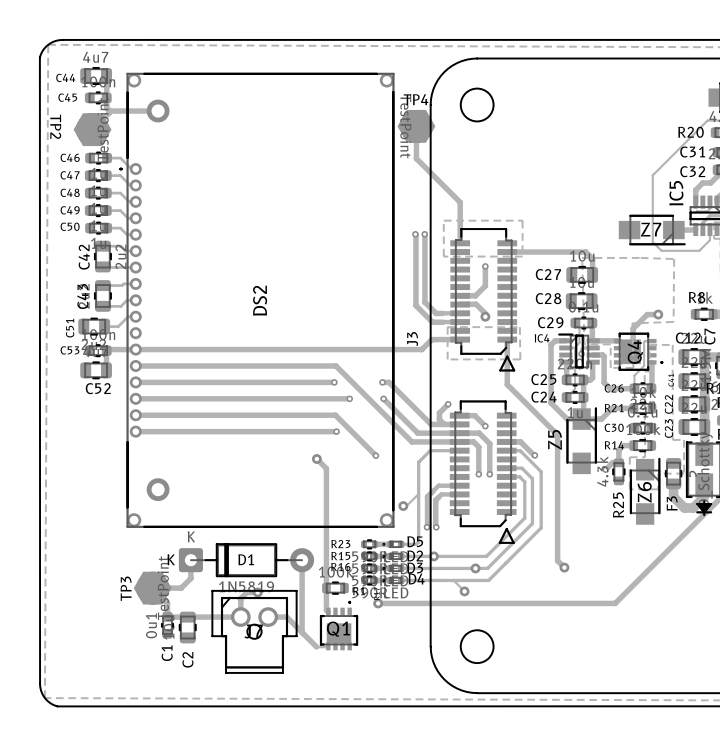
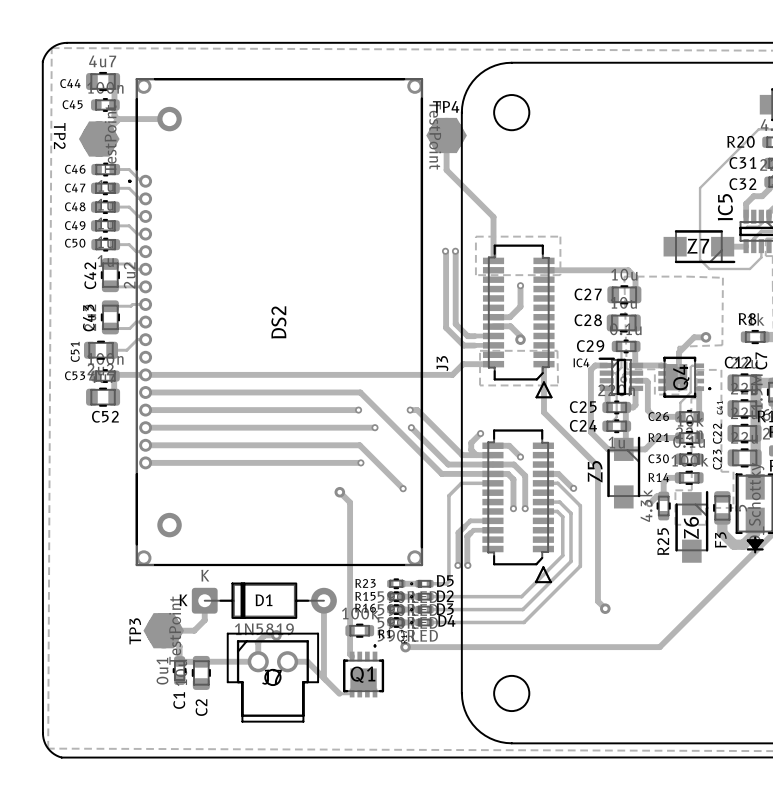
track: (418, 494) (406, 506) (403, 506) -> none
via: (403, 506) -> none
via: (433, 556) -> none
via: (475, 568) -> none
track: (453, 580) (464, 591) -> none
via: (464, 591) -> none

